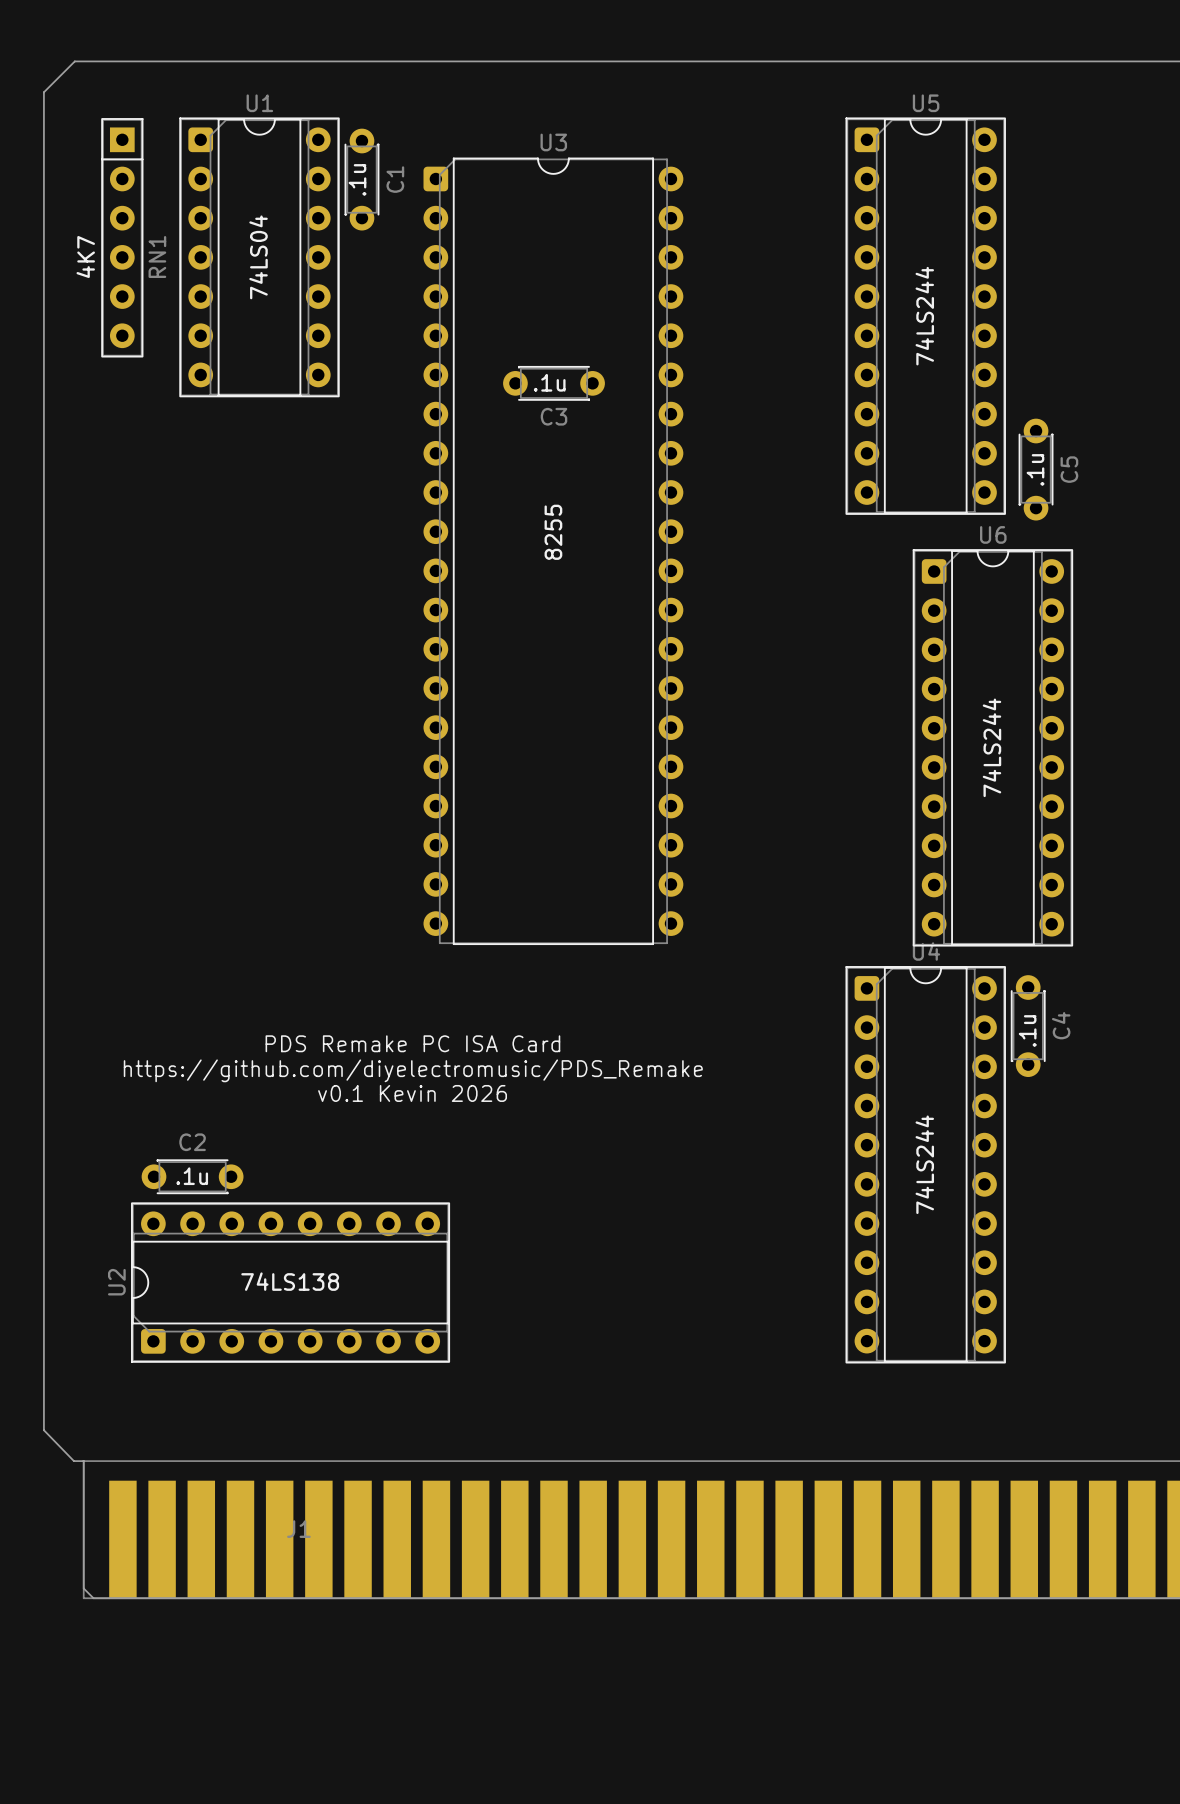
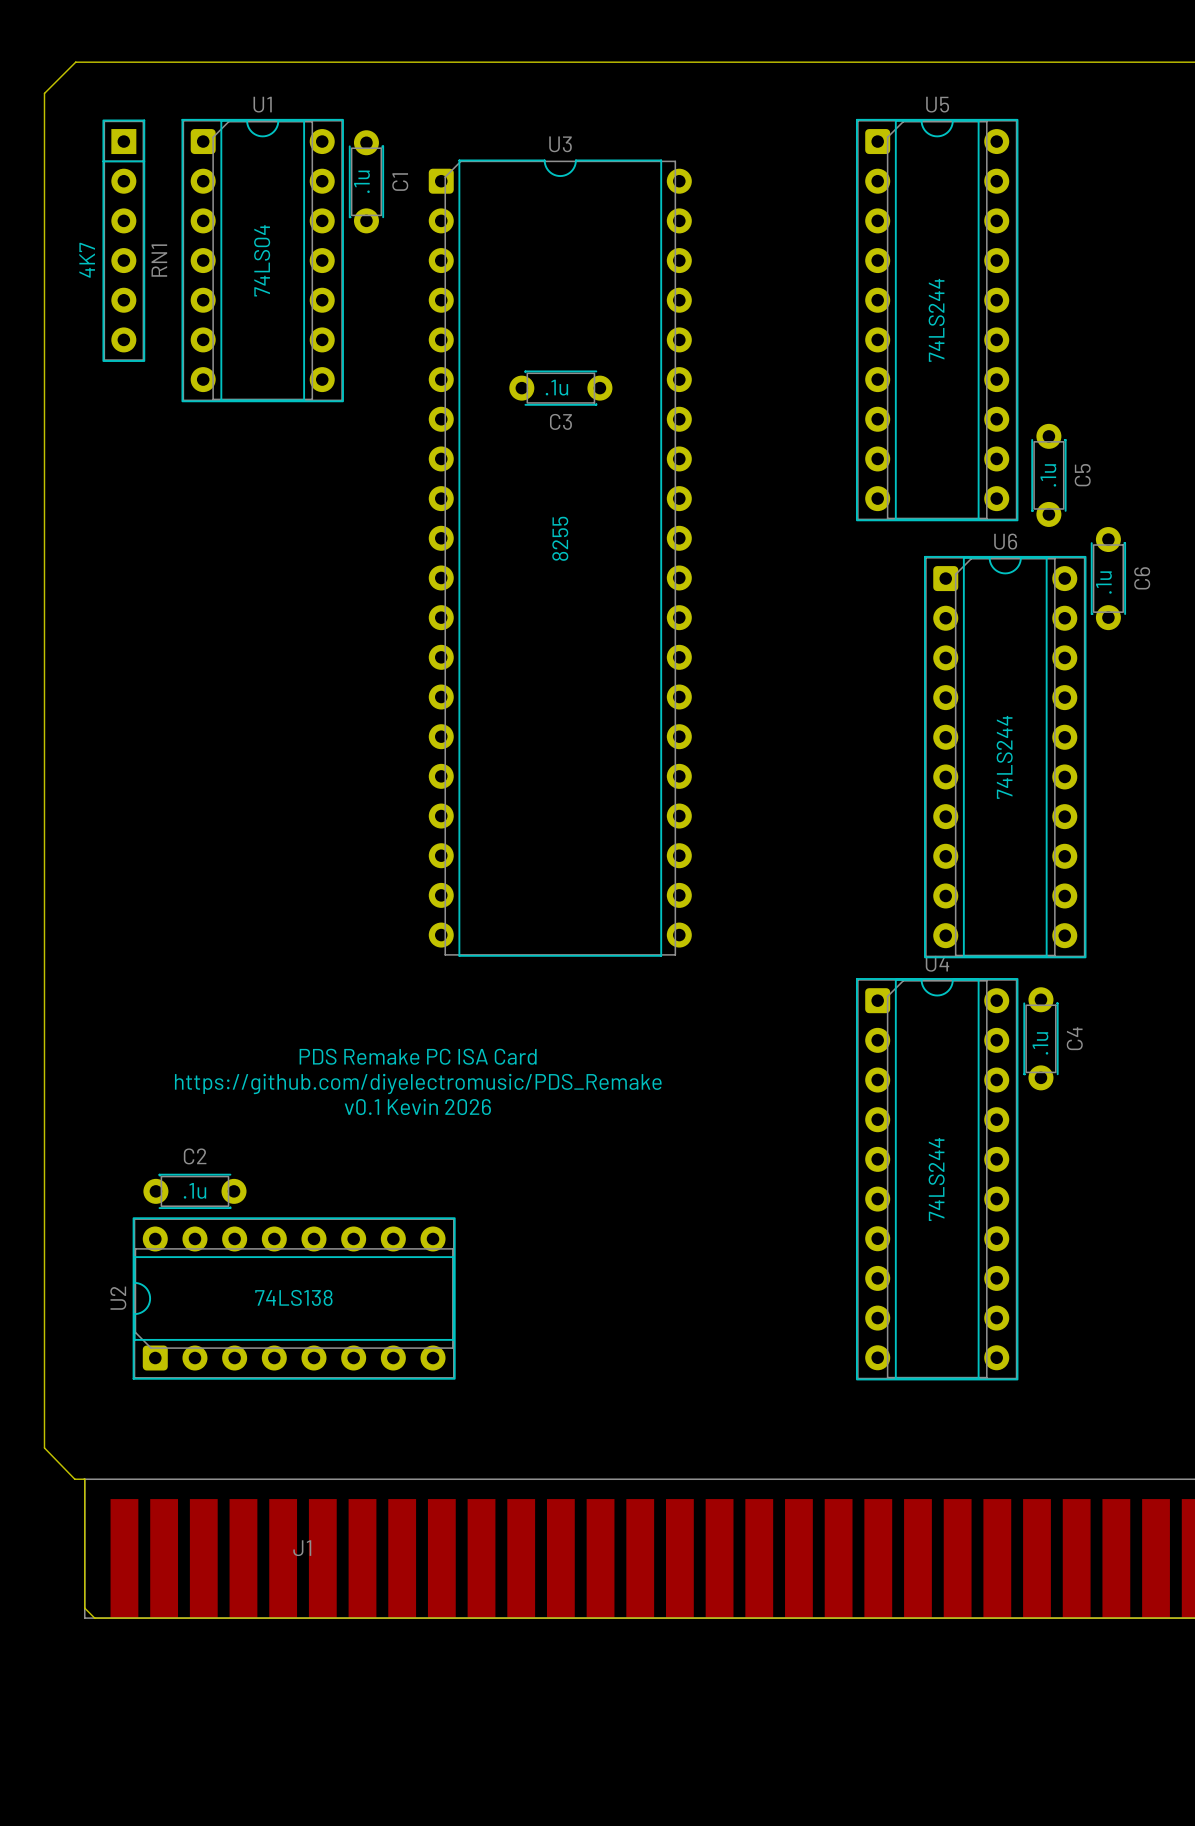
C6: none -> .1u (1108, 578)

